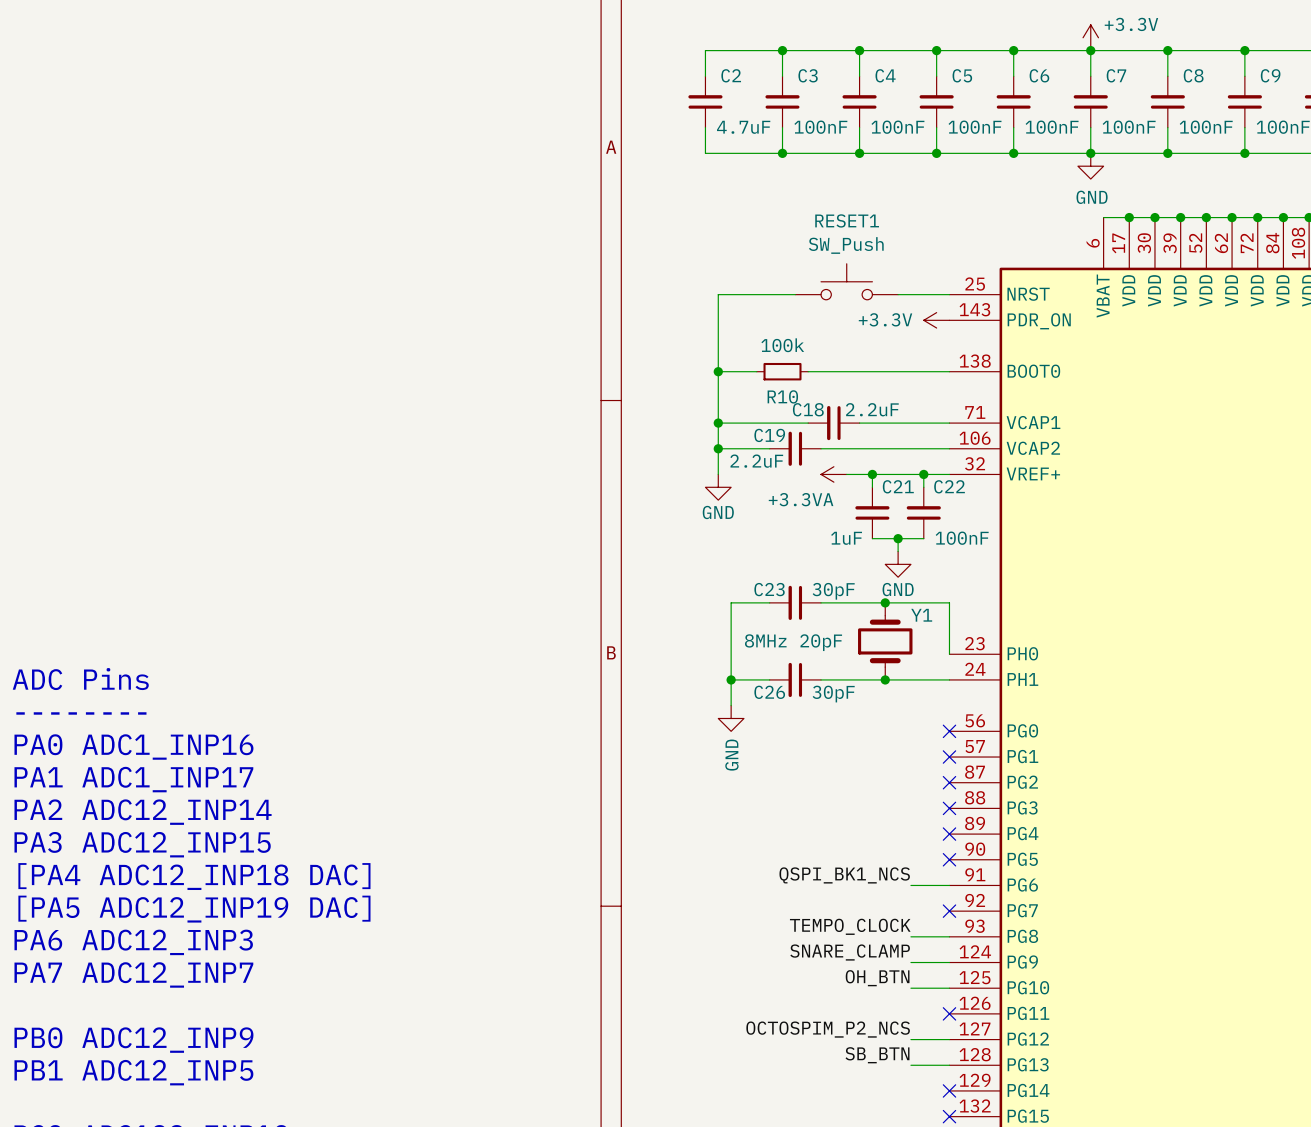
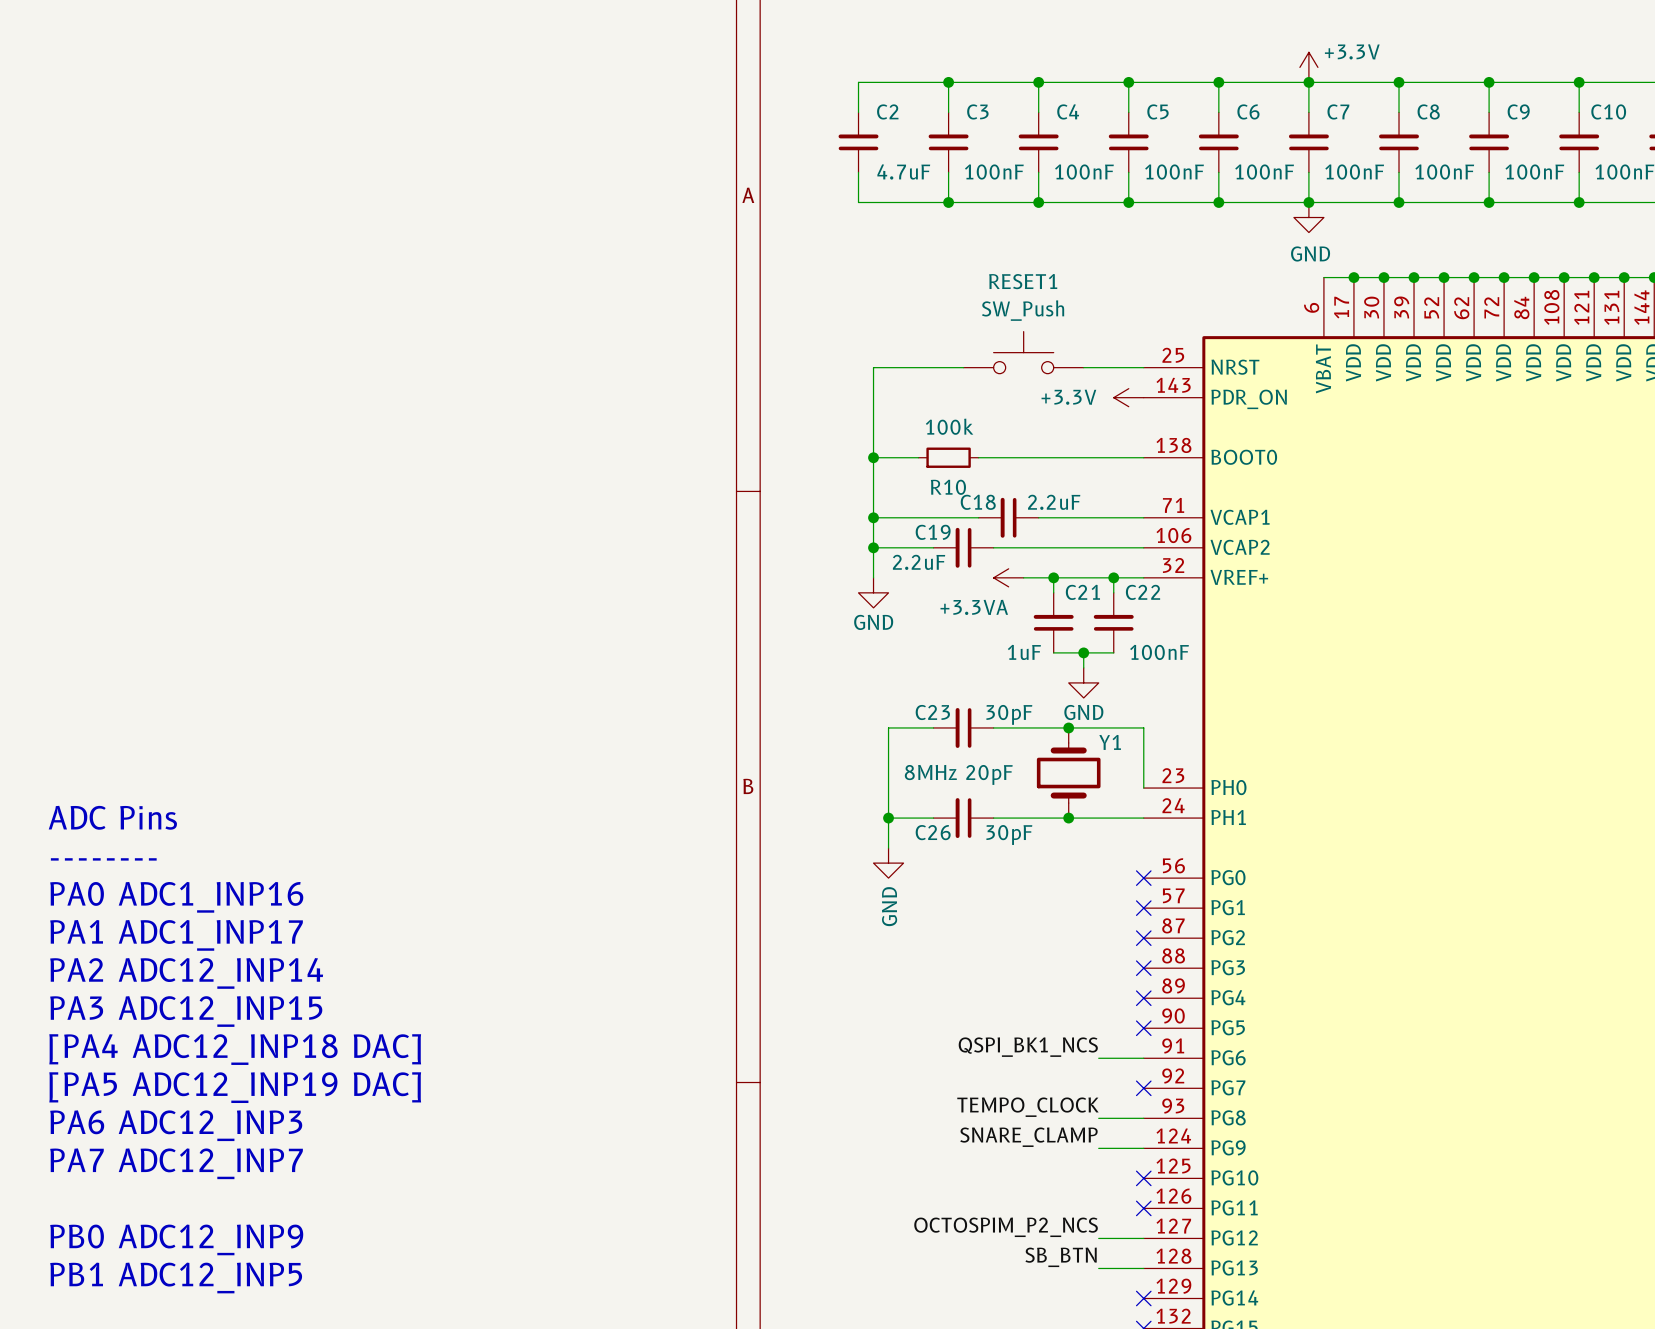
label: OH_BTN (877, 978) -> none
wire: (910, 988) (949, 988) -> none
no-connect mark: none -> (1143, 1178)

